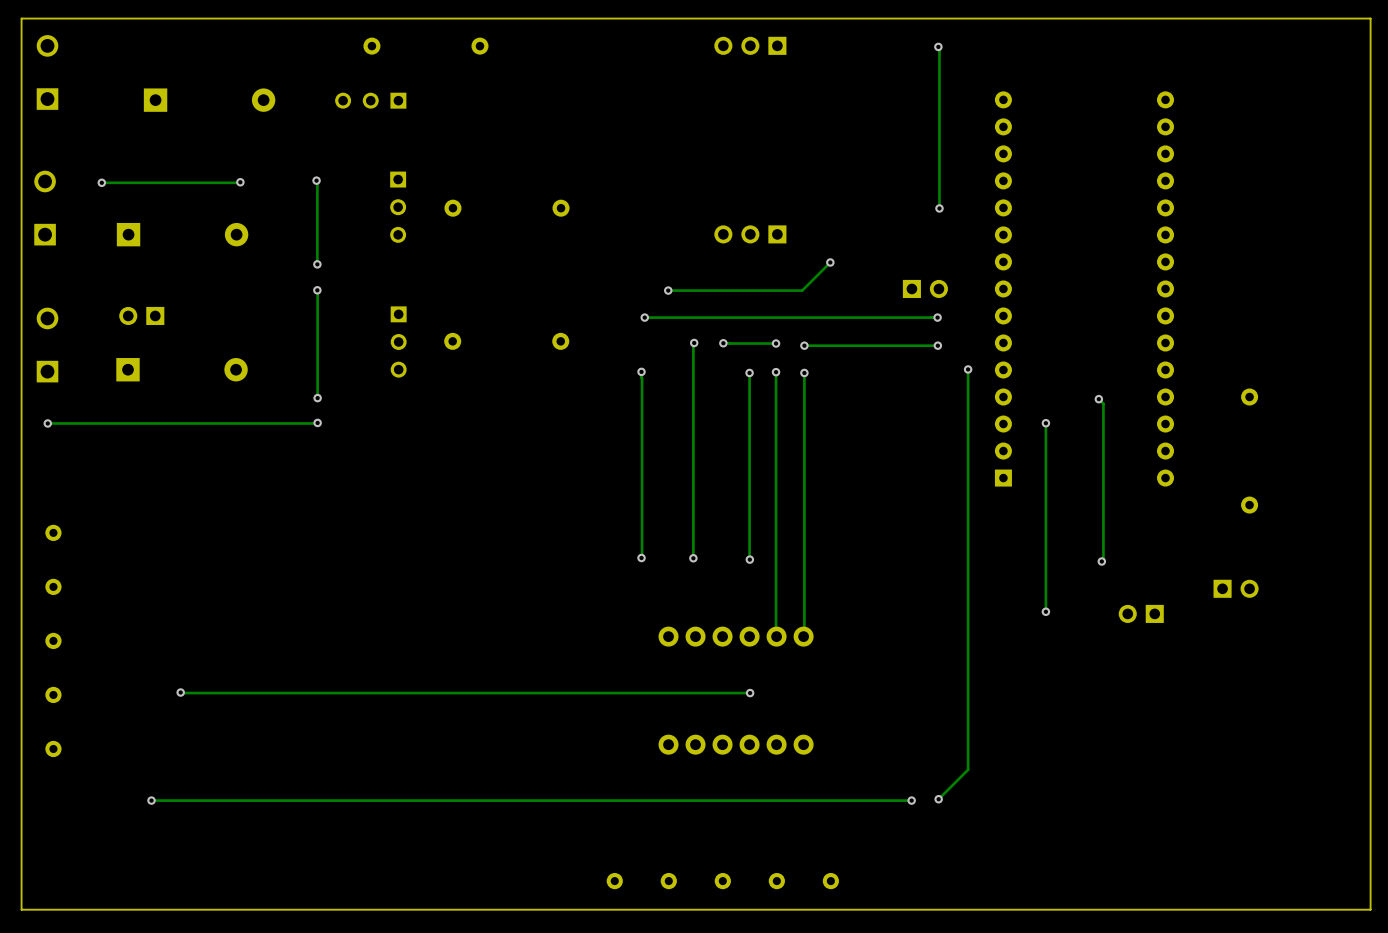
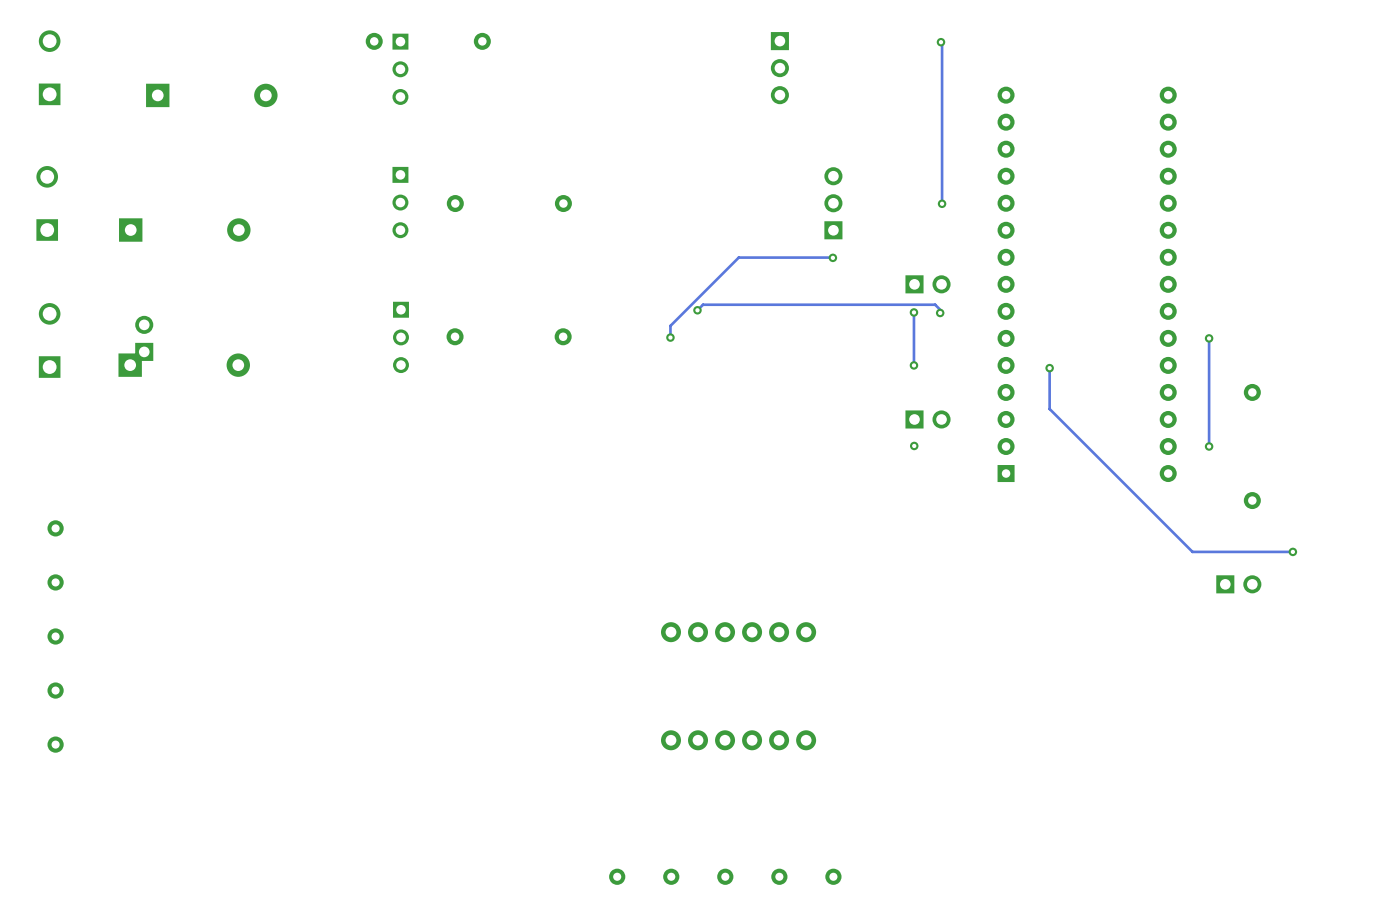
board edge: (1370, 18) (1370, 909) (21, 909) (21, 18) (1370, 18) -> none
part rotation: 0° (750, 45) -> 90° counterclockwise (779, 68)
part rotation: 0° (370, 100) -> 90° counterclockwise (400, 69)
track: (316, 180) (317, 264) -> none
via: (316, 180) -> none
via: (101, 182) -> none
track: (240, 182) (101, 182) -> none
via: (240, 182) -> none
part: none -> (833, 203)
part: (750, 234) -> none
track: (830, 262) (802, 290) (668, 290) -> none
track: none -> (833, 257) (738, 257) (670, 325) (670, 337)
via: (317, 264) -> none
track: (317, 290) (317, 398) -> none
via: (317, 290) -> none
via: (668, 290) -> none
track: none -> (697, 310) (703, 304) (935, 304) (942, 311)
via: none -> (697, 310)
part rotation: 0° (141, 315) -> 90° clockwise (144, 338)
via: (644, 317) -> none
track: none -> (913, 312) (913, 365)
via: none -> (913, 312)
track: (937, 317) (644, 317) -> none
via: none -> (670, 337)
track: (694, 342) (693, 558) -> none
via: (694, 342) -> none
track: none -> (1209, 338) (1209, 446)
via: none -> (1209, 338)
track: (723, 343) (776, 343) -> none
via: (723, 343) -> none
via: (776, 343) -> none
via: (804, 345) -> none
track: (937, 345) (804, 345) -> none
via: (937, 345) -> none
via: none -> (913, 365)
track: (968, 369) (968, 769) (938, 799) -> none
via: (968, 369) -> none
track: (641, 371) (641, 558) -> none
via: (641, 371) -> none
track: (749, 372) (750, 558) -> none
via: (749, 372) -> none
track: (776, 372) (776, 636) -> none
via: (776, 372) -> none
track: (804, 372) (803, 636) -> none
via: (804, 372) -> none
track: none -> (1049, 368) (1049, 408) (1192, 551) (1292, 551)
via: none -> (1049, 368)
via: (317, 398) -> none
track: (1098, 399) (1103, 403) (1103, 559) (1101, 561) -> none
via: (1098, 399) -> none
track: (317, 422) (47, 423) -> none
via: (317, 422) -> none
via: (47, 423) -> none
track: (1045, 423) (1045, 611) -> none
via: (1045, 423) -> none
part: none -> (928, 419)
via: none -> (914, 445)
via: none -> (1209, 446)
via: none -> (1292, 551)
via: (641, 558) -> none
via: (693, 558) -> none
via: (749, 559) -> none
via: (1101, 561) -> none
via: (1045, 611) -> none
part: (1141, 613) -> none
track: (180, 692) (750, 693) -> none
via: (180, 692) -> none
via: (750, 693) -> none
via: (938, 799) -> none
via: (151, 800) -> none
track: (911, 800) (151, 800) -> none
via: (911, 800) -> none

